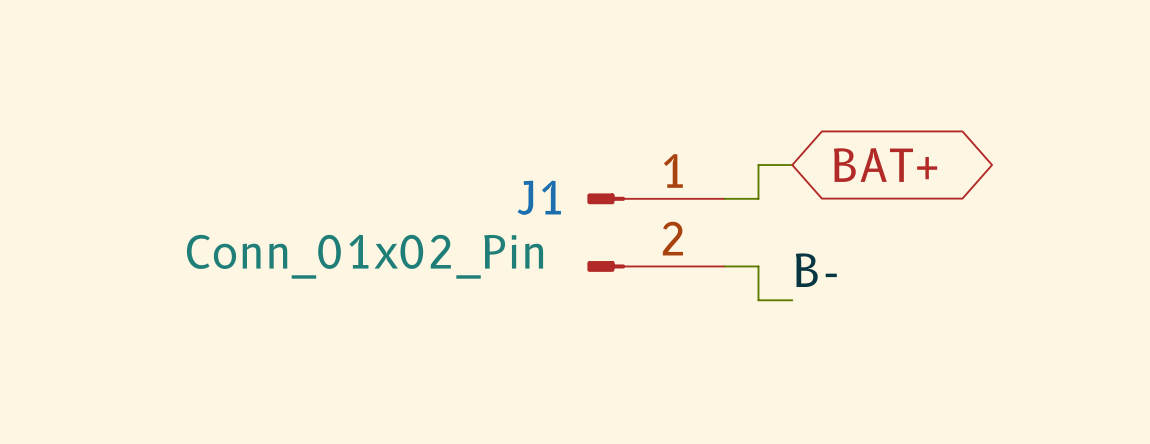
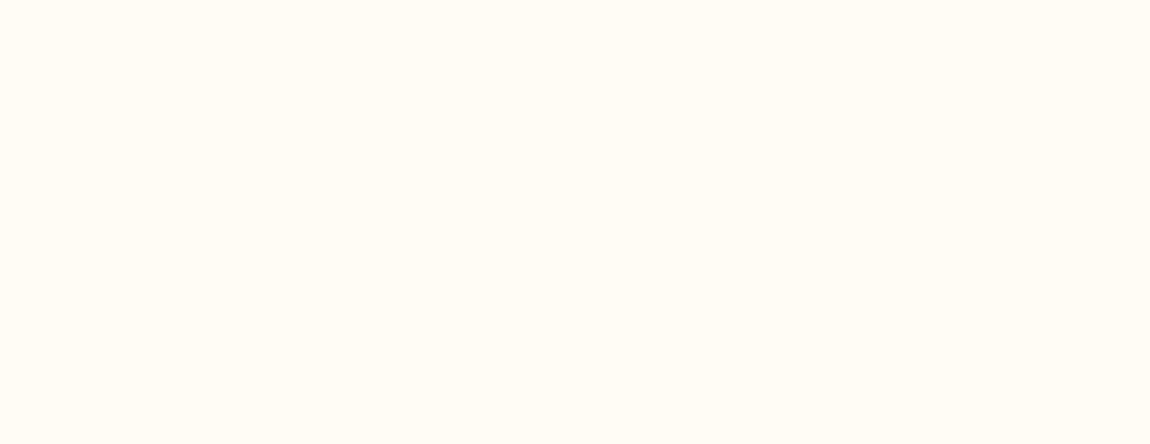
wire: (792, 165) (758, 165) (758, 198) (724, 198) -> none
global label: BAT+ (885, 165) -> none
J1: Conn_01x02_Pin (656, 232) -> none
wire: (724, 266) (758, 266) (758, 300) (792, 300) -> none
label: B- (816, 270) -> none

